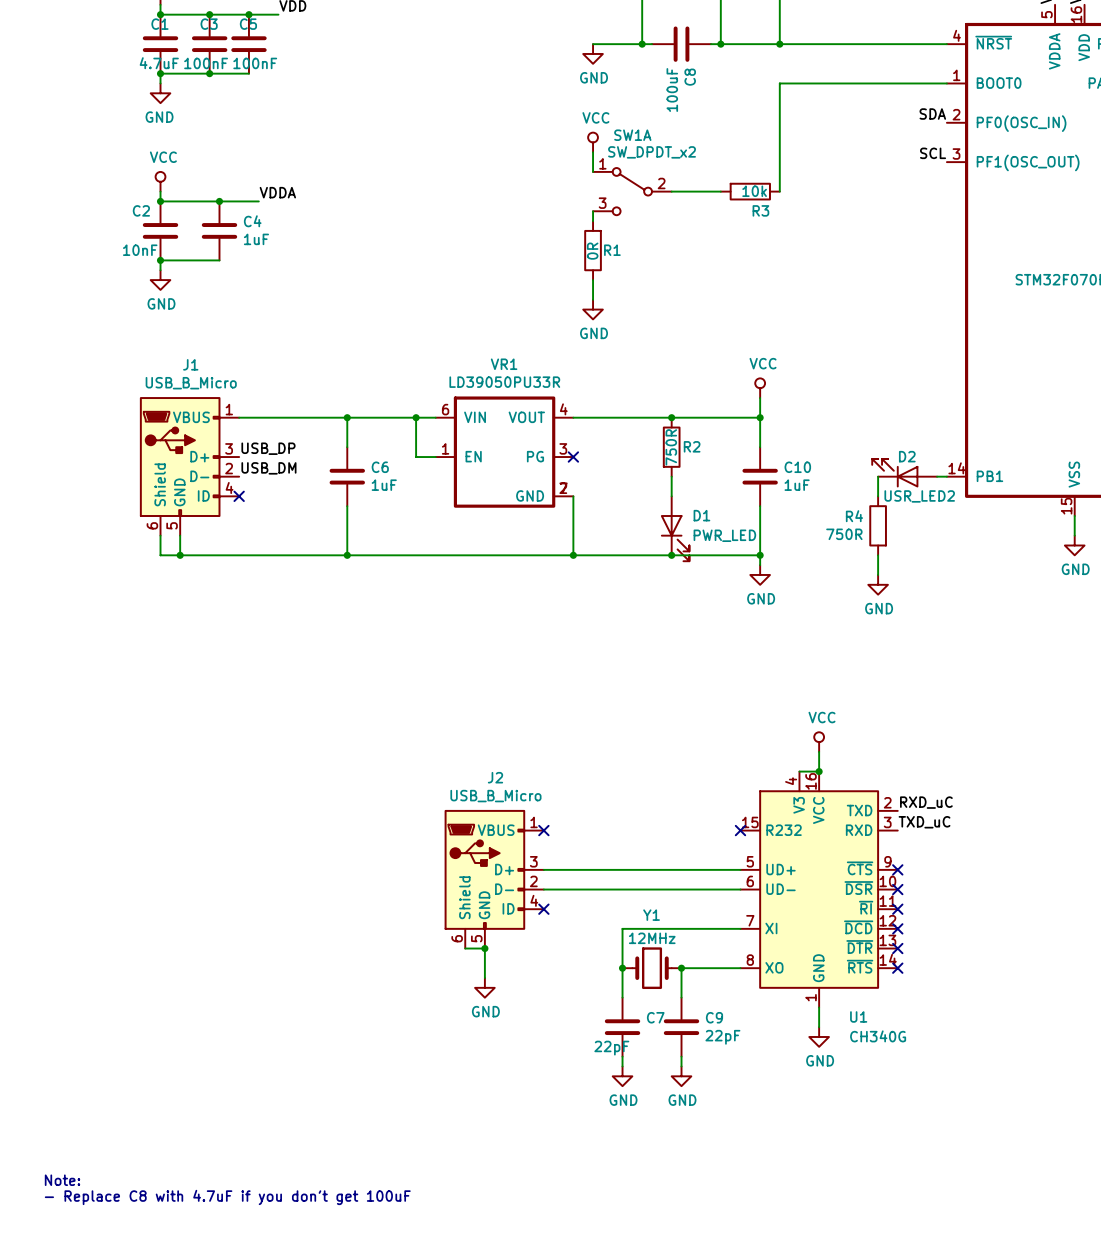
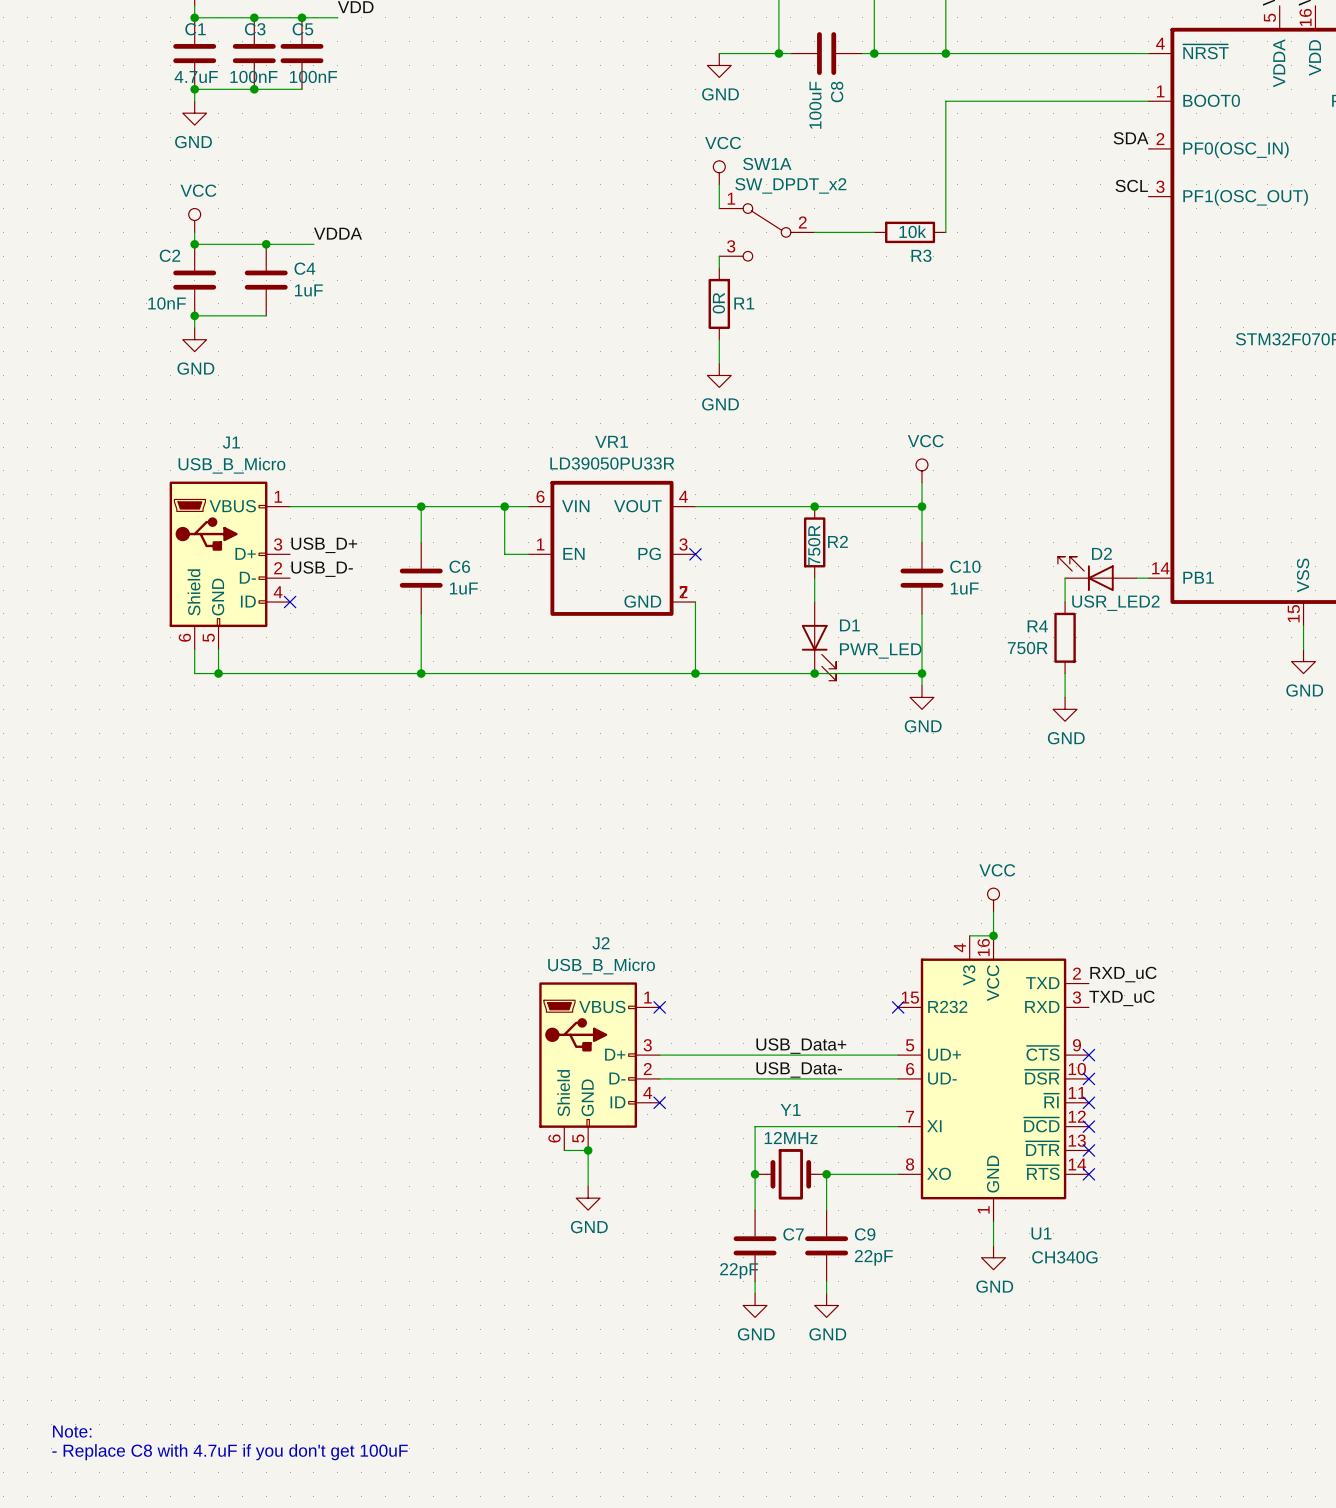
label: USB_DP (268, 448) -> USB_D+ (324, 545)
label: USB_DM (268, 468) -> USB_D- (322, 569)
label: none -> USB_Data+ (801, 1046)
label: none -> USB_Data- (799, 1069)

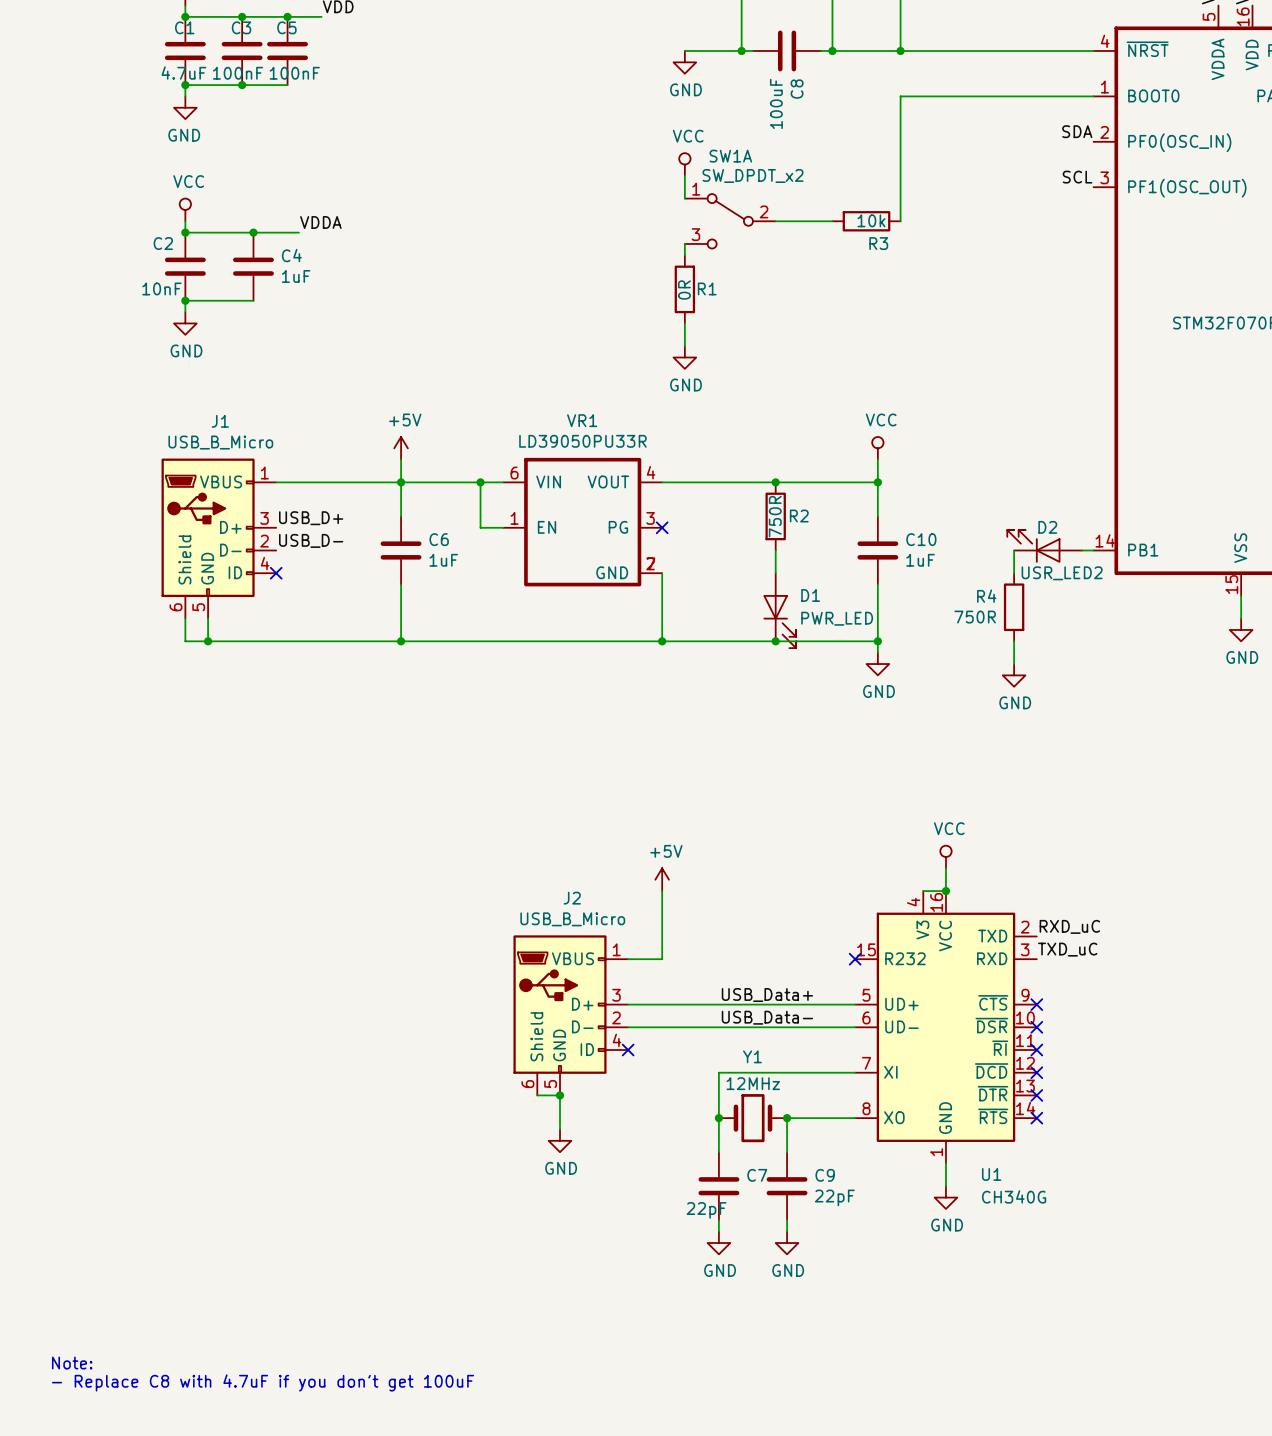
power symbol: none -> +5V (401, 448)
wire: none -> (401, 459) (401, 482)
power symbol: none -> +5V (662, 879)
wire: none -> (662, 891) (662, 959) (628, 959)
no-connect mark: (659, 1007) -> none

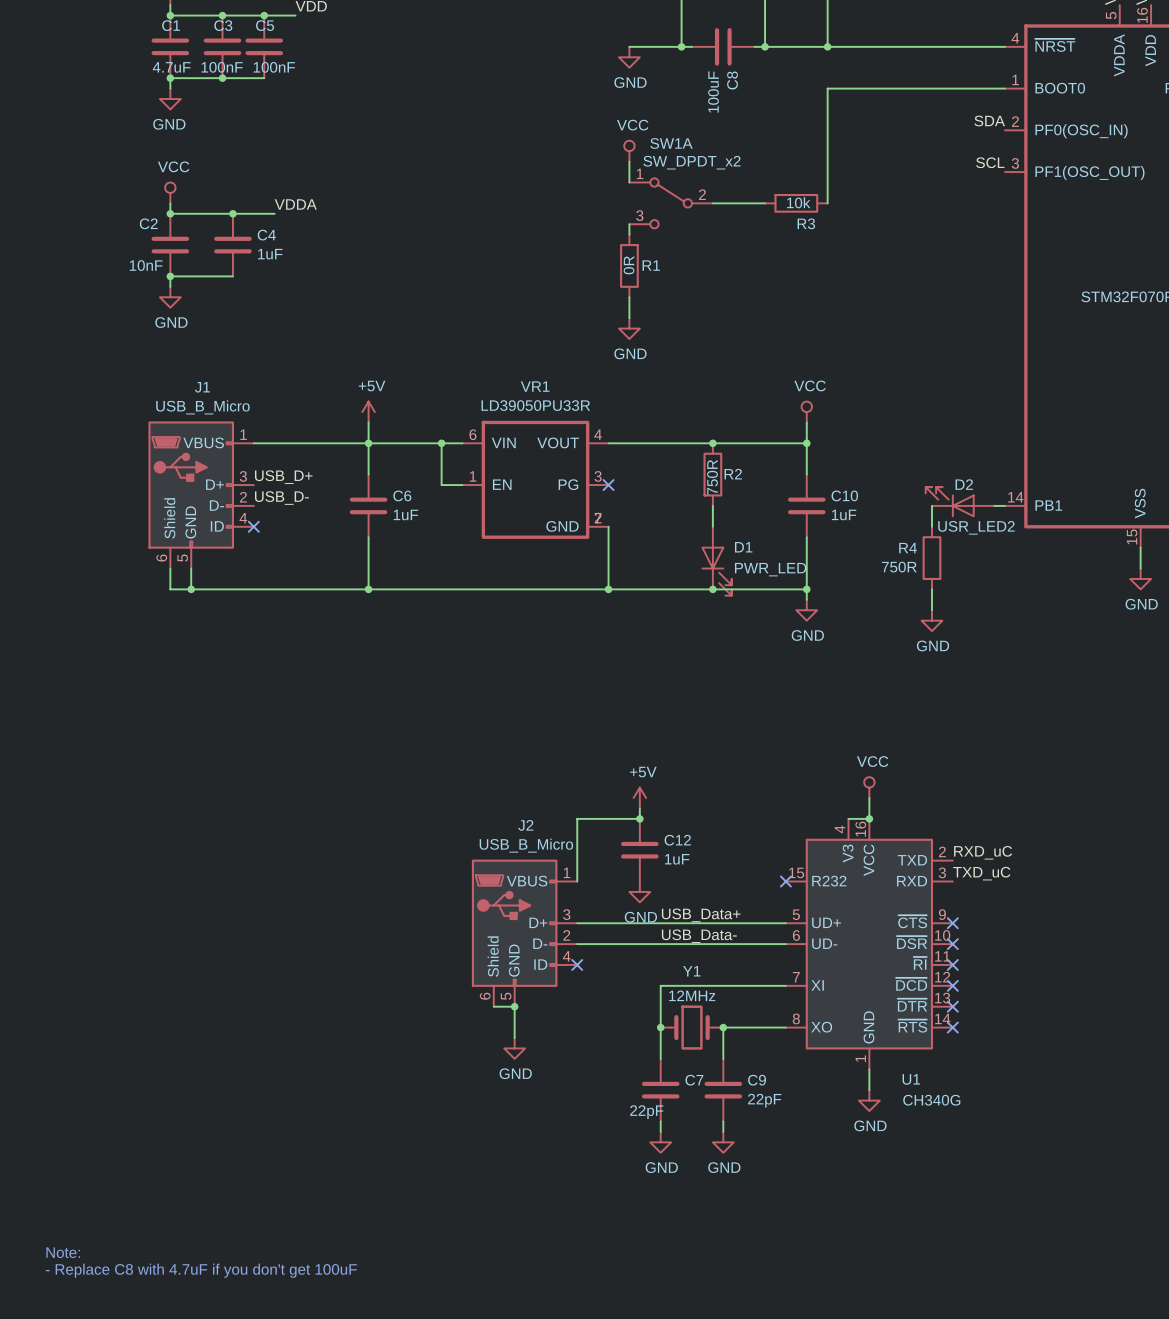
power symbol position: +5V (662, 879) -> +5V (639, 798)
wire: (662, 891) (662, 959) (628, 959) -> (639, 808) (639, 818) (577, 818) (577, 881)
junction: none -> (639, 818)
C12: none -> 1uF (639, 850)
power symbol: none -> GND (639, 891)

